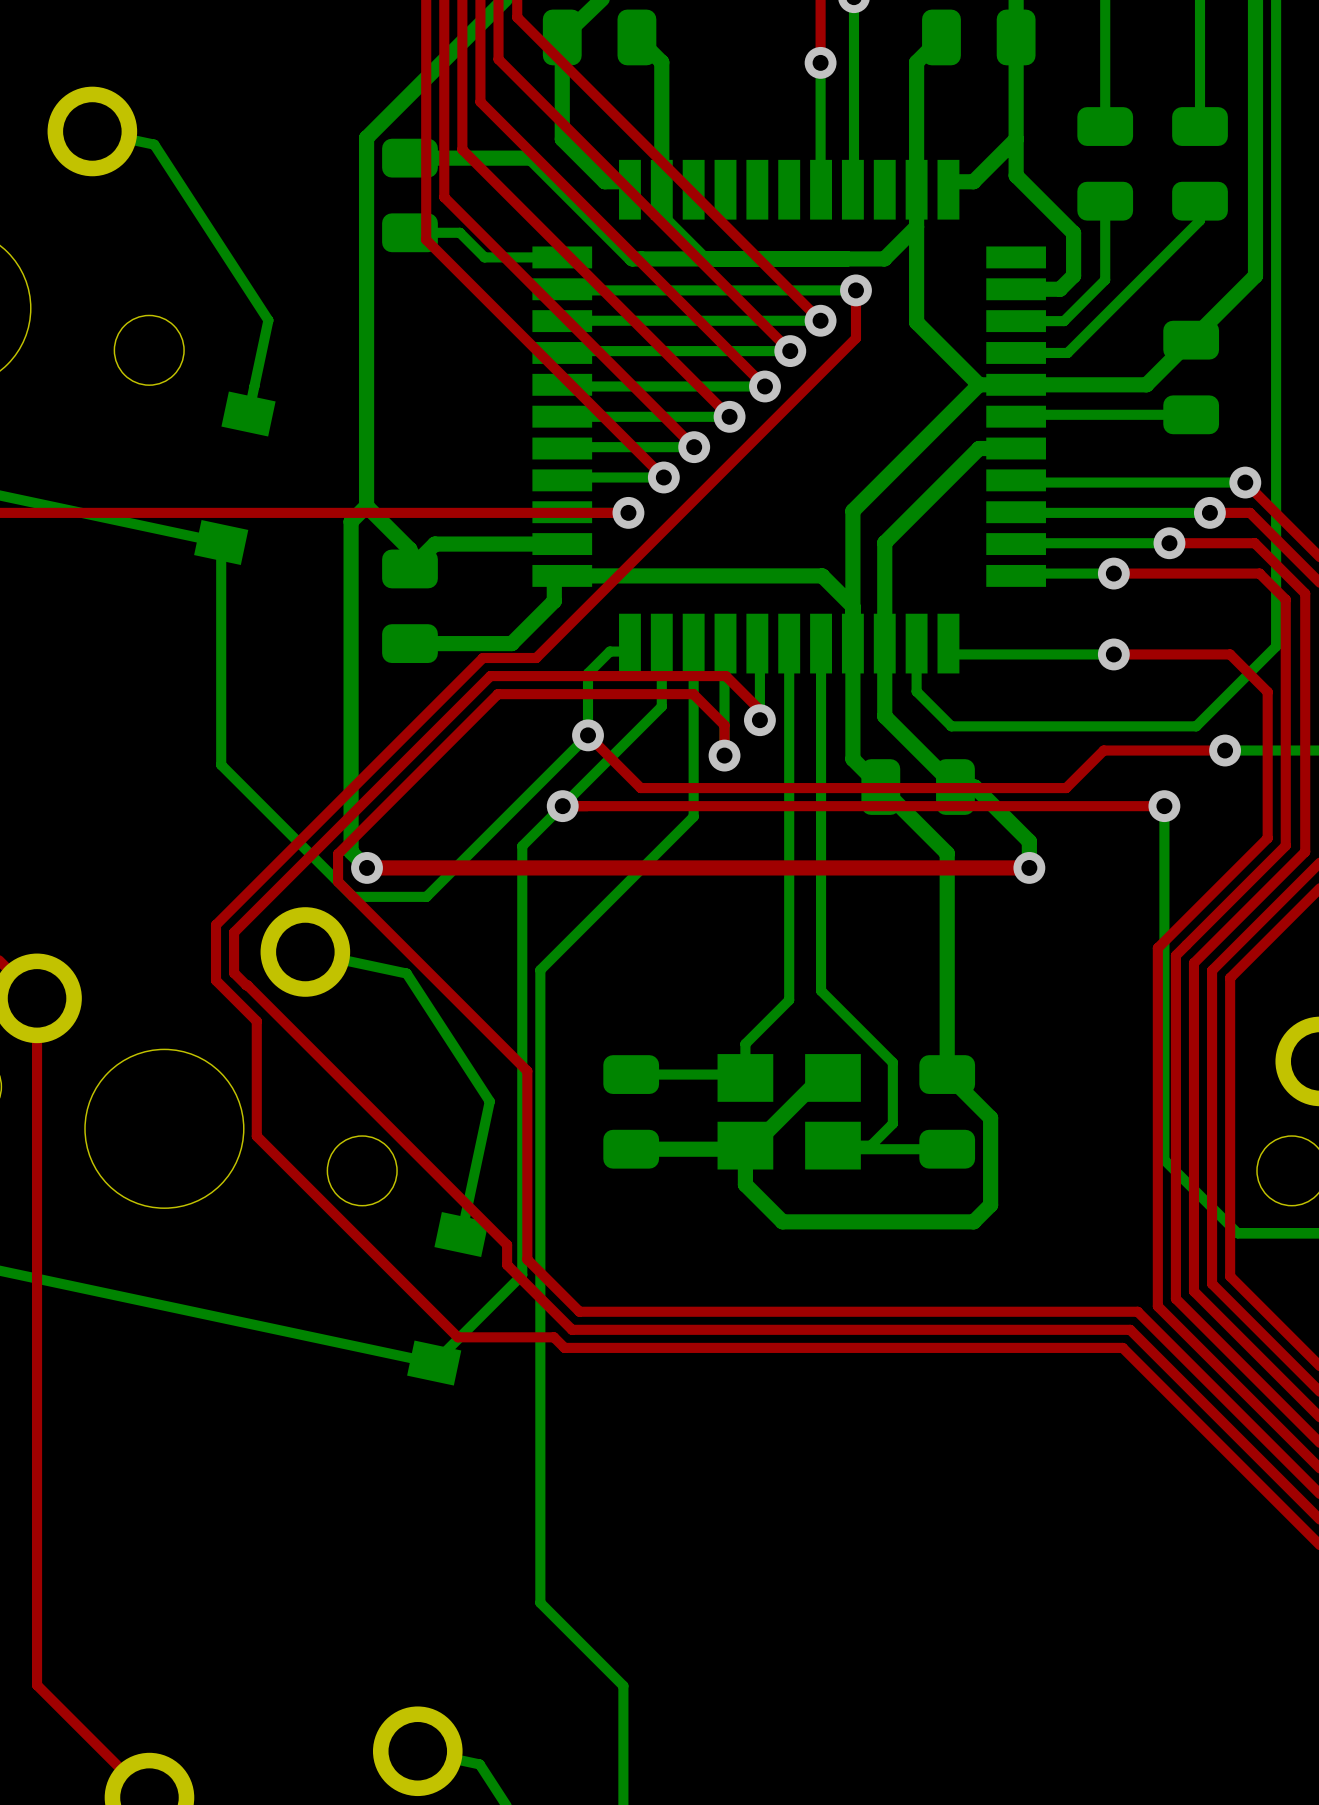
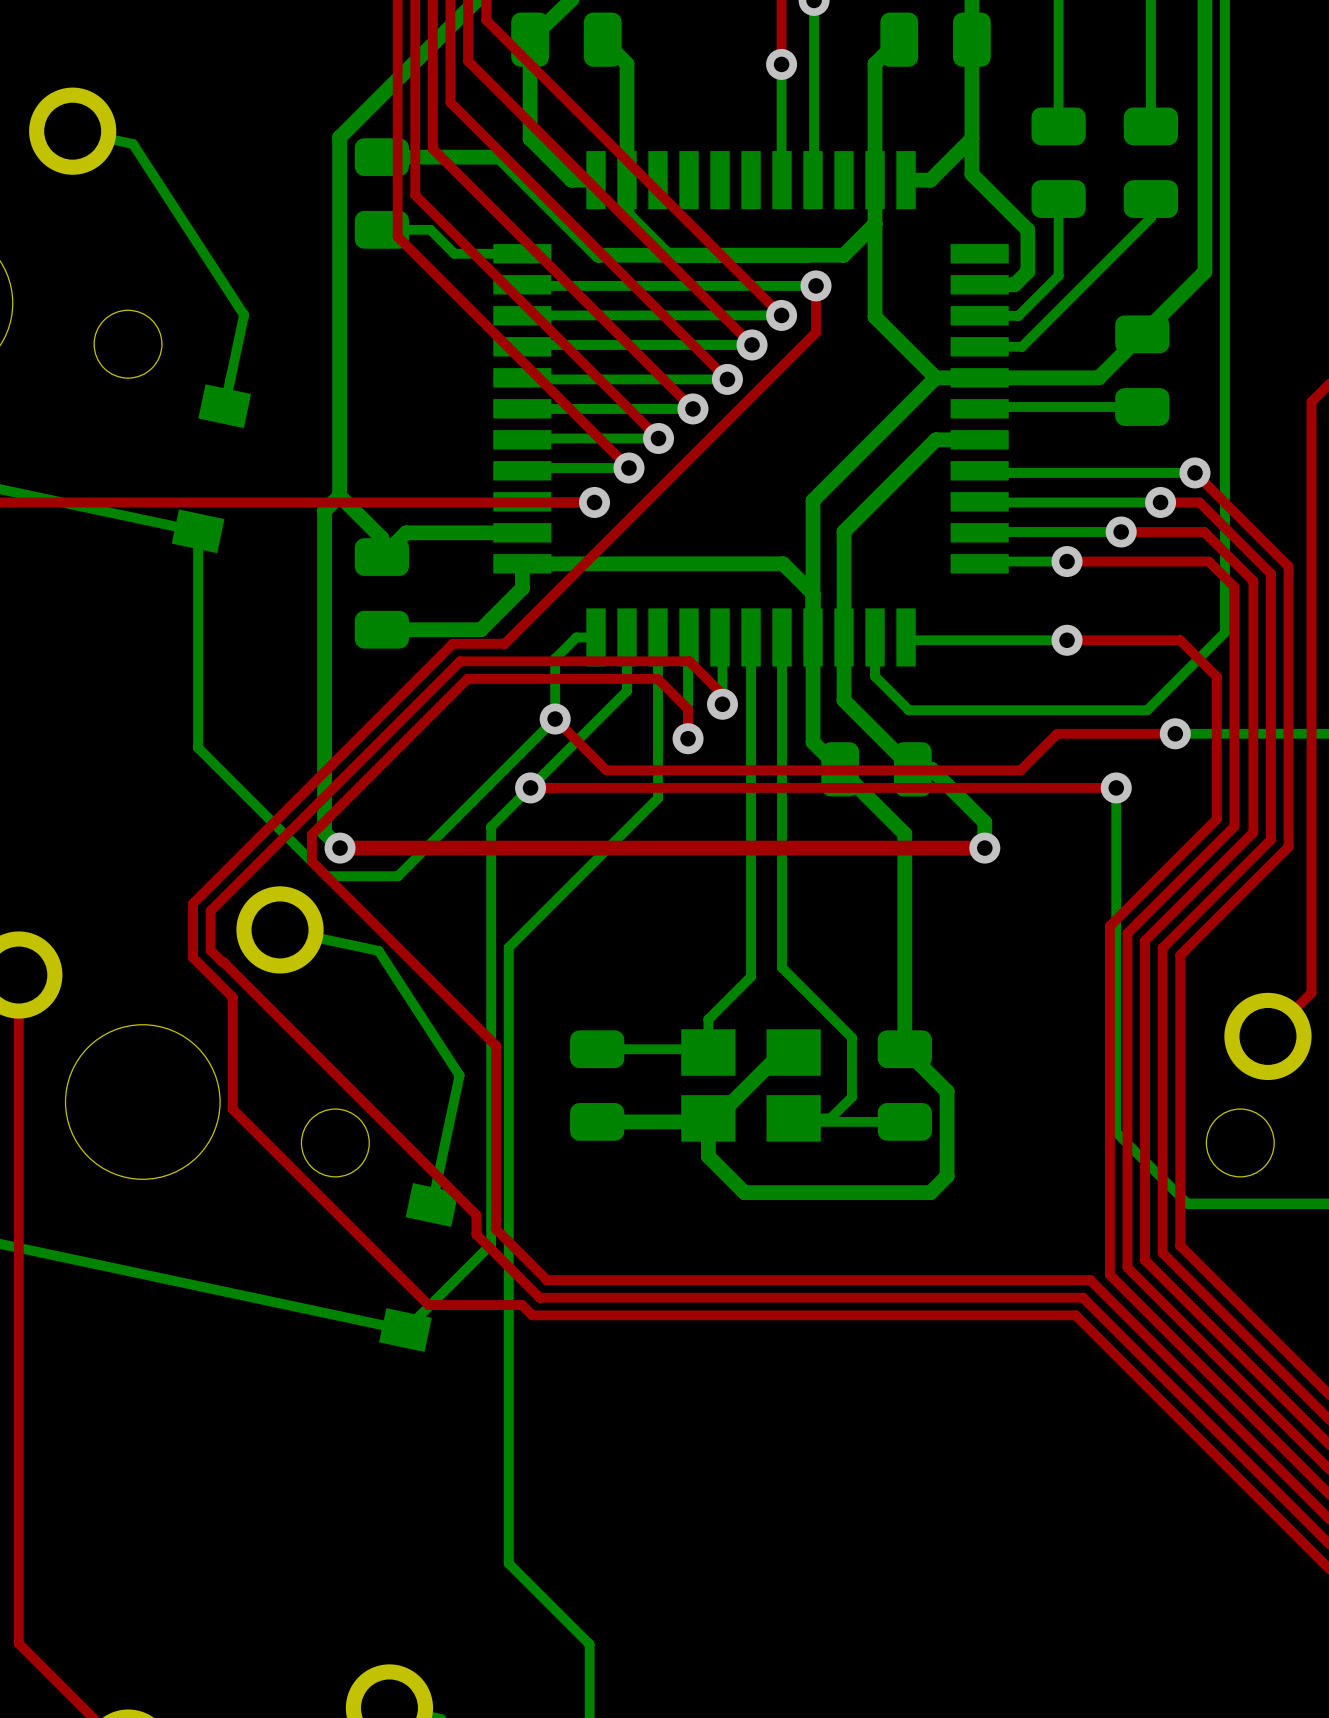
part footprint: [532, 159, 1046, 674] -> [493, 151, 1009, 667]

